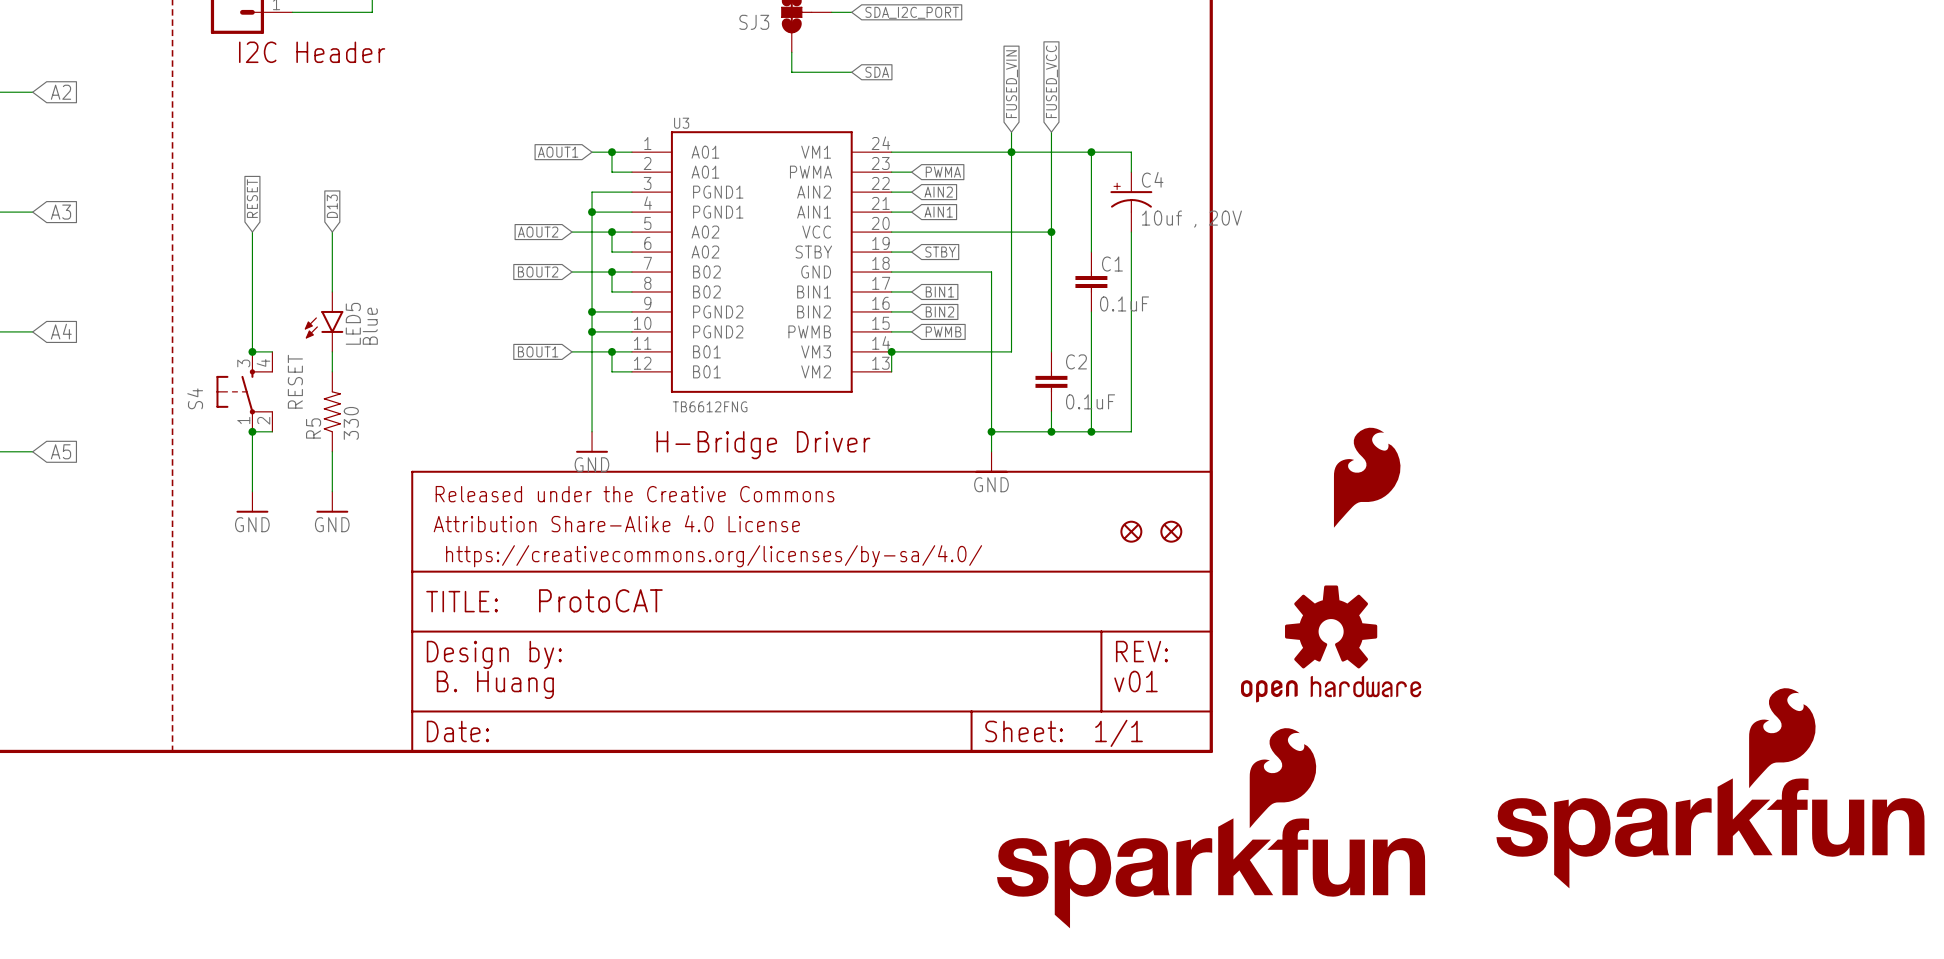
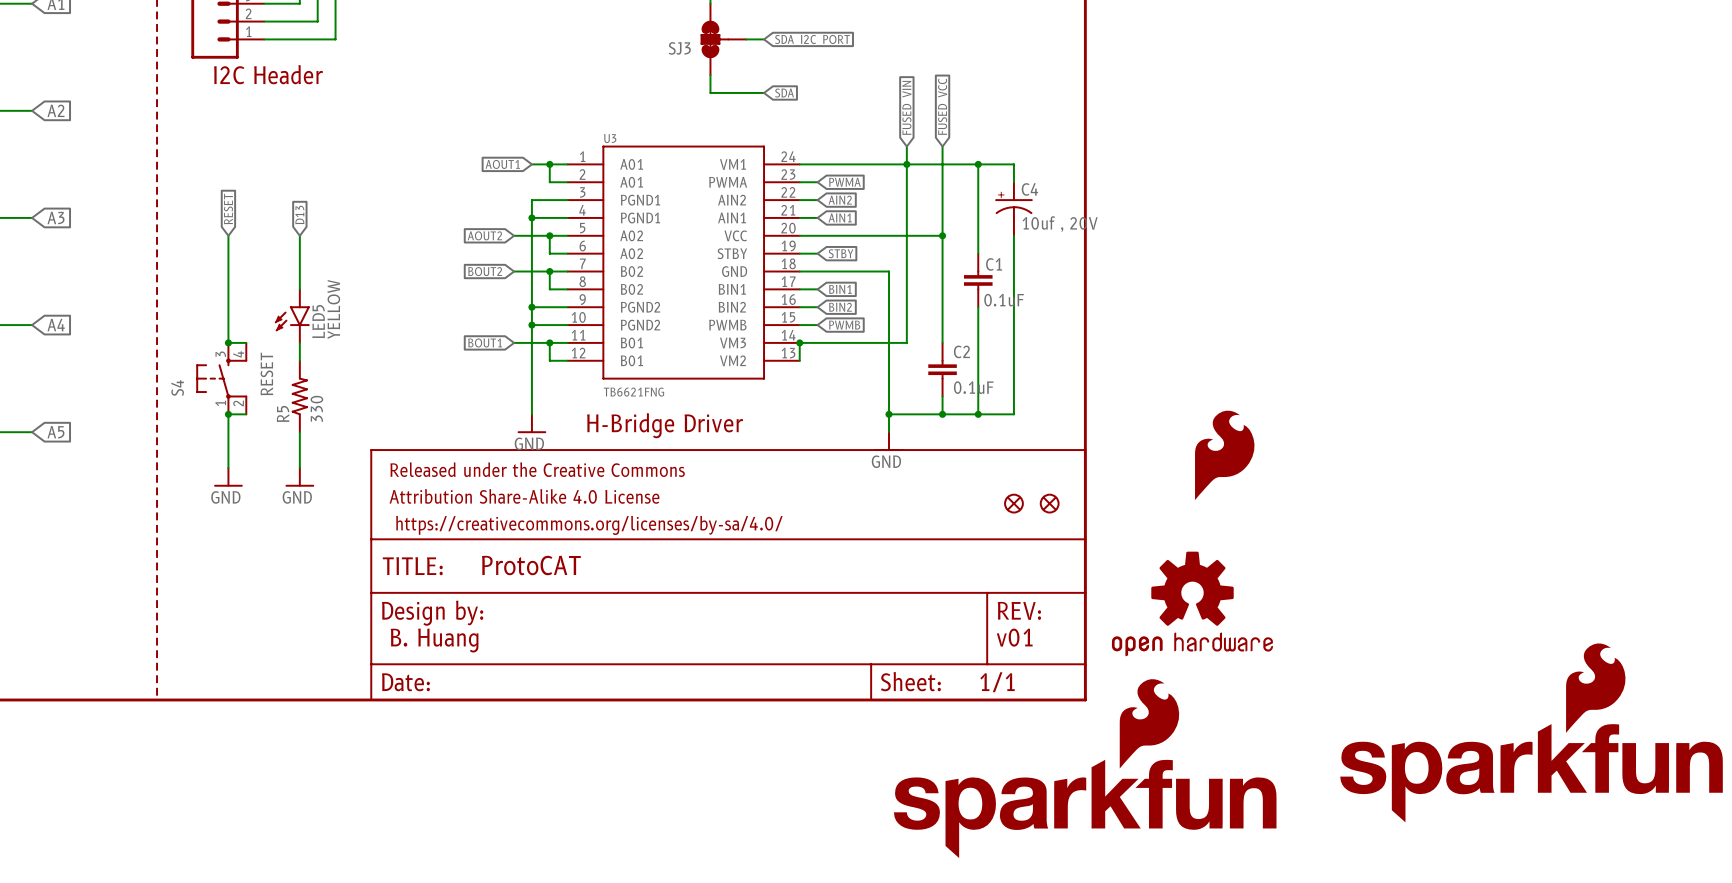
LED5 value: Blue (370, 326) -> YELLOW (333, 309)
U3 value: TB6612FNG (710, 406) -> TB6621FNG (633, 392)

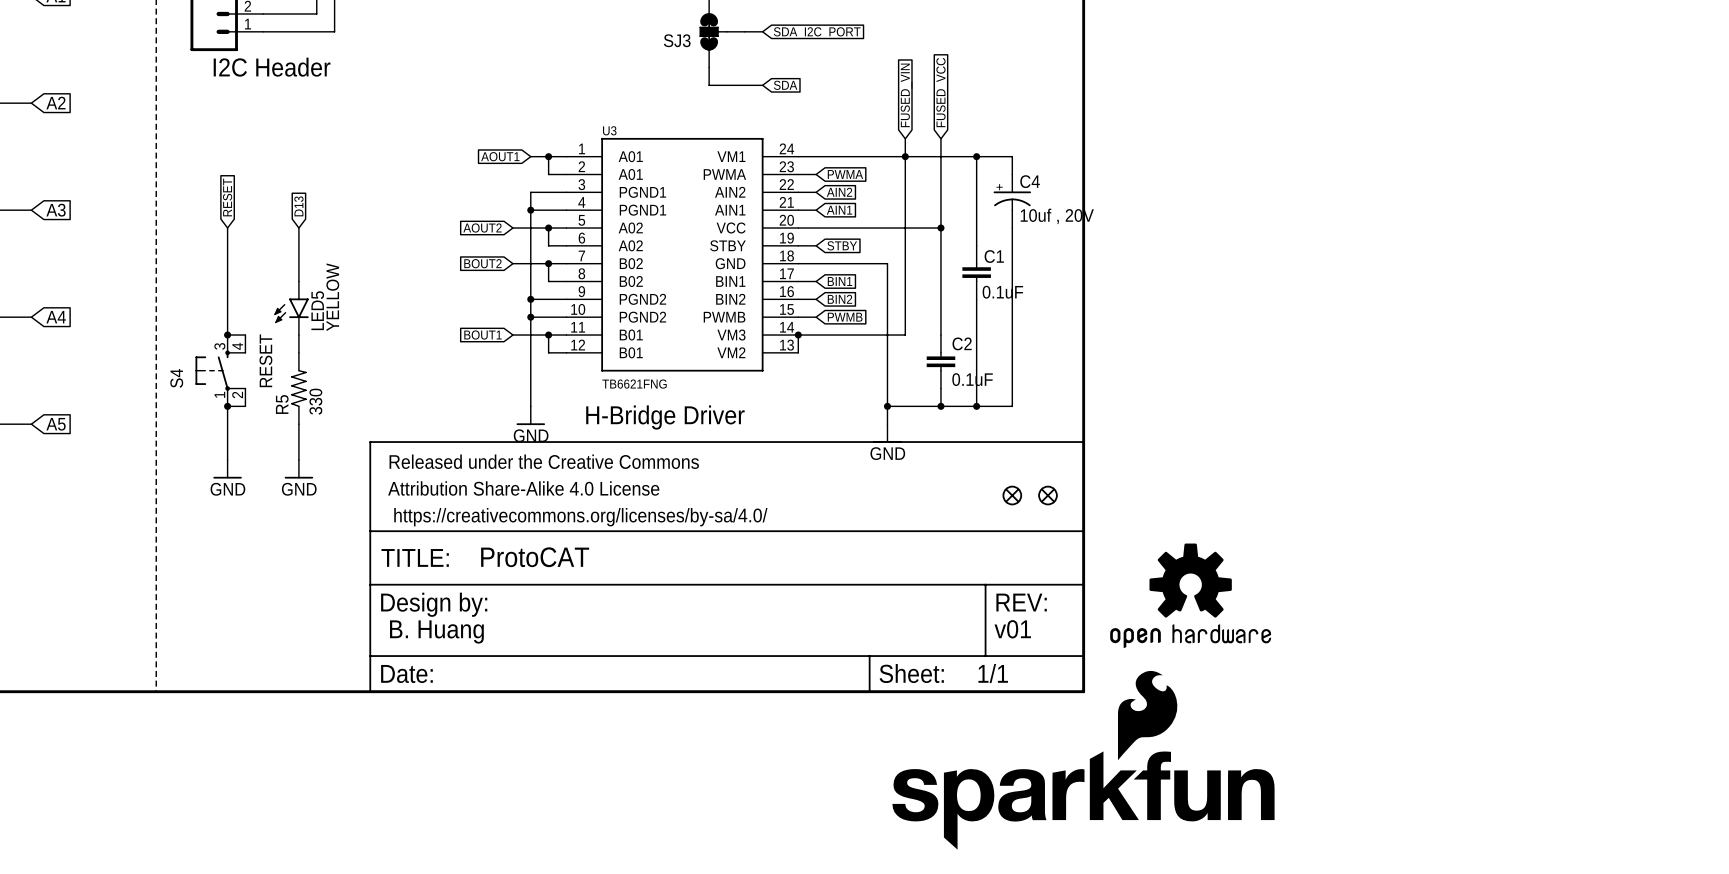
part: (1224, 455) -> none
part: (1531, 732) -> none

